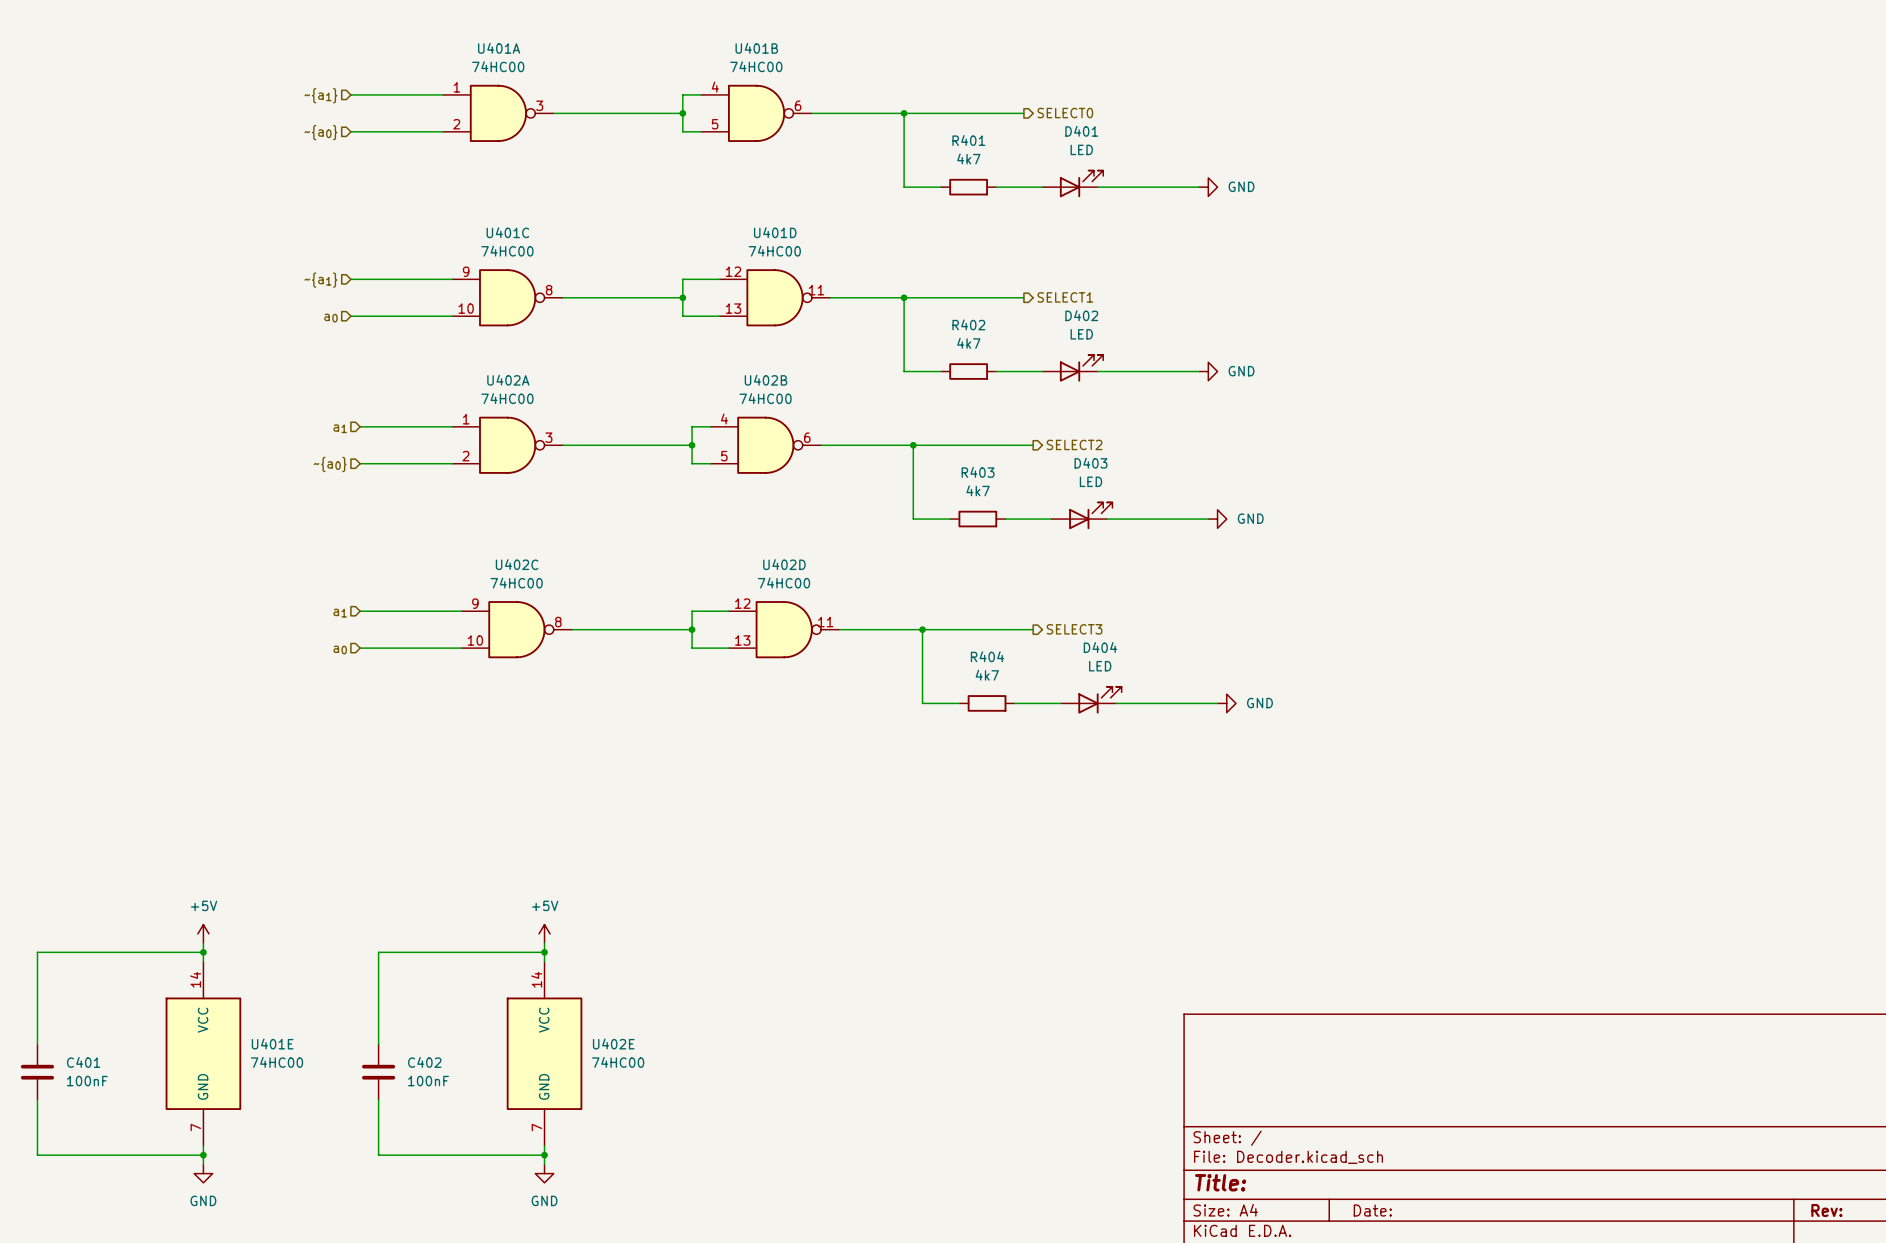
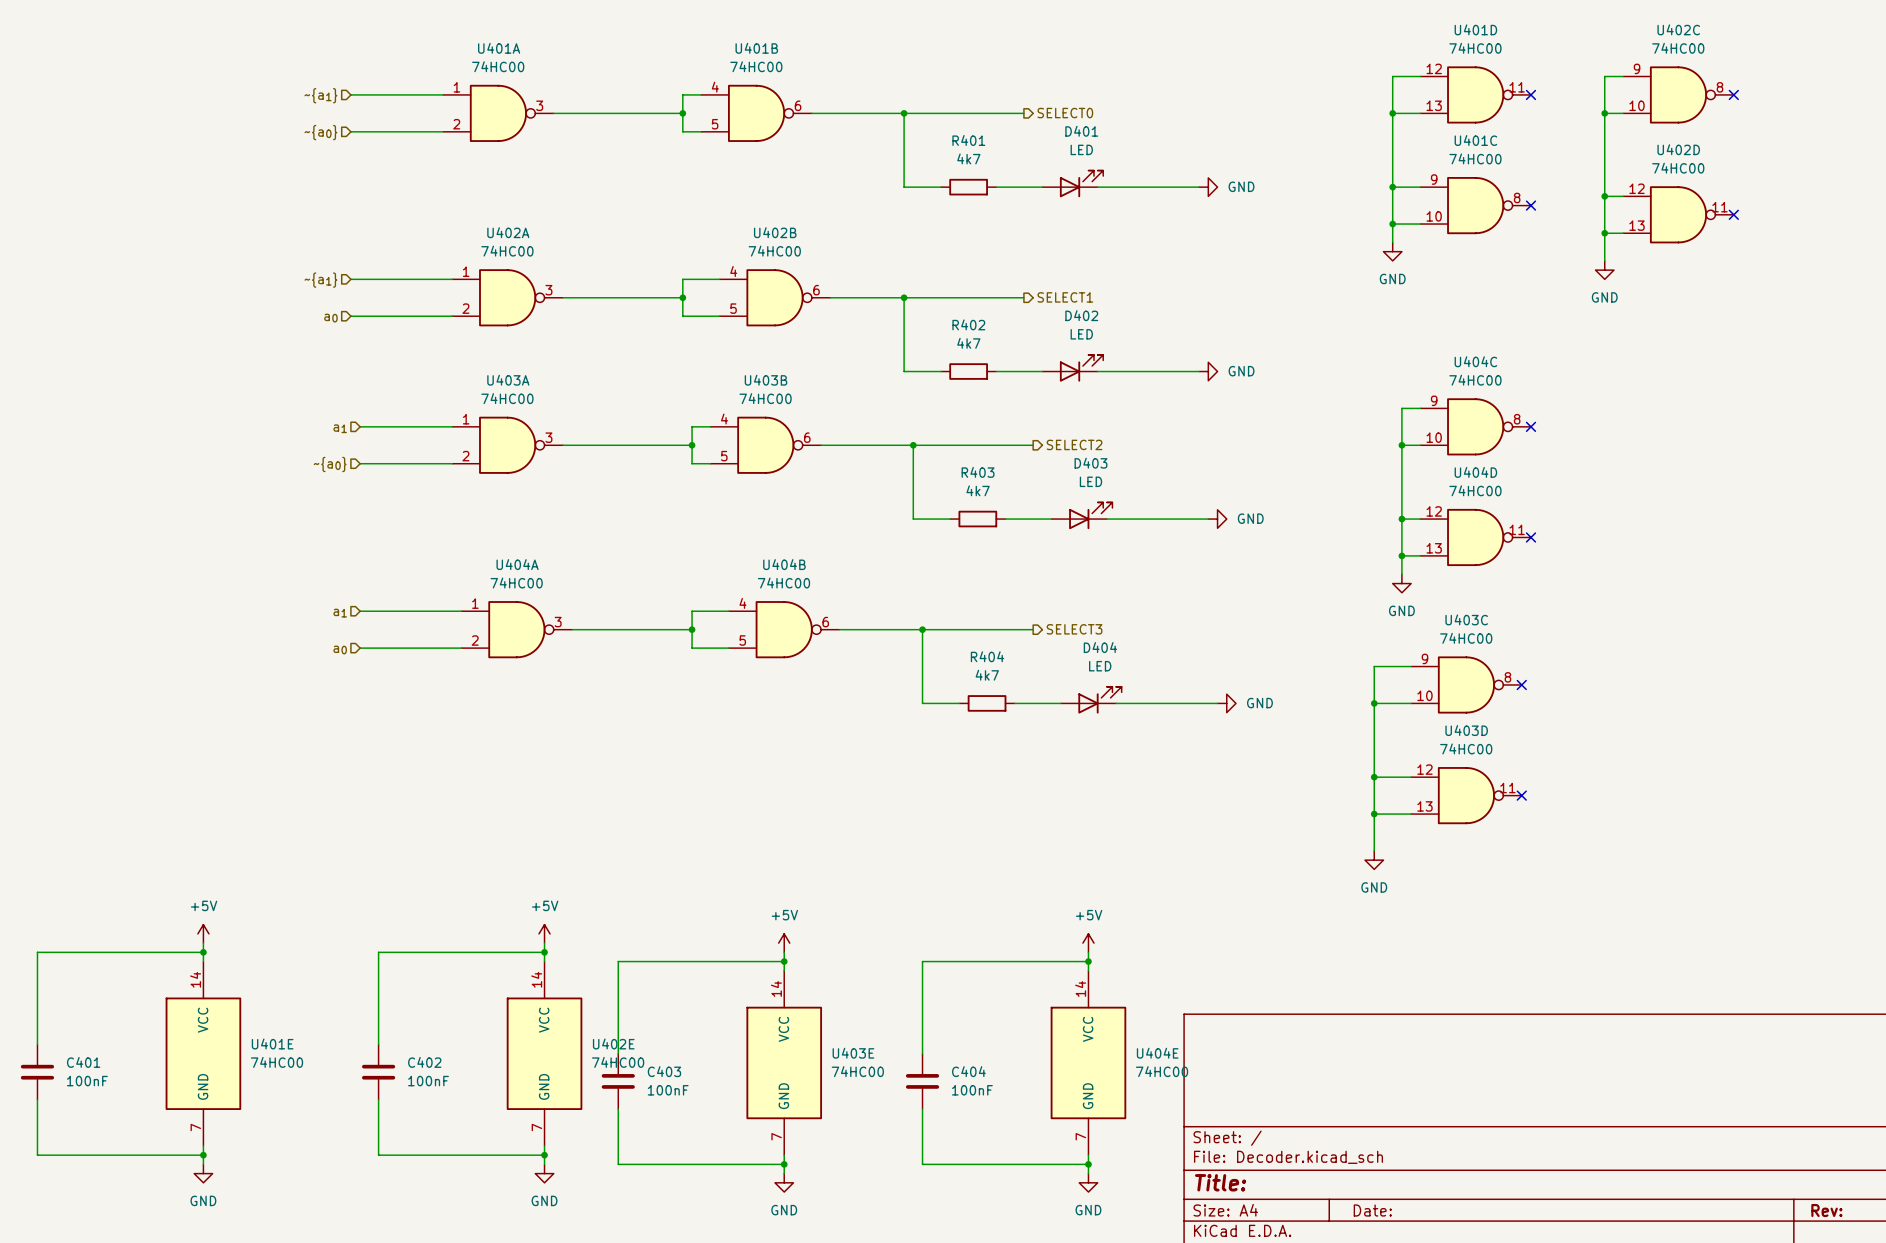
wire: none -> (1420, 76) (1392, 76) (1392, 242)
wire: none -> (1623, 76) (1604, 76) (1604, 260)
no-connect mark: none -> (1530, 94)
no-connect mark: none -> (1733, 94)
wire: none -> (1392, 113) (1420, 113)
junction: none -> (1392, 113)
wire: none -> (1604, 113) (1623, 113)
junction: none -> (1604, 113)
wire: none -> (1392, 187) (1420, 187)
junction: none -> (1392, 187)
wire: none -> (1604, 196) (1623, 196)
junction: none -> (1604, 196)
no-connect mark: none -> (1530, 205)
no-connect mark: none -> (1733, 214)
wire: none -> (1392, 224) (1420, 224)
junction: none -> (1392, 224)
wire: none -> (1604, 233) (1623, 233)
junction: none -> (1604, 233)
power symbol: none -> GND (1392, 251)
power symbol: none -> GND (1604, 270)
U401C position: (507, 297) -> (1475, 205)
U402A: none -> 74HC00 (507, 297)
U401D position: (775, 297) -> (1475, 94)
U402B: none -> 74HC00 (775, 297)
U402A name: U402A (508, 380) -> U403A (508, 380)
U402B name: U402B (766, 380) -> U403B (766, 380)
wire: none -> (1420, 408) (1401, 408) (1401, 574)
U404C: none -> 74HC00 (1475, 426)
no-connect mark: none -> (1530, 426)
wire: none -> (1401, 445) (1420, 445)
junction: none -> (1401, 445)
wire: none -> (1401, 519) (1420, 519)
junction: none -> (1401, 519)
U404D: none -> 74HC00 (1475, 537)
no-connect mark: none -> (1530, 537)
wire: none -> (1401, 555) (1420, 555)
junction: none -> (1401, 555)
power symbol: none -> GND (1401, 583)
U402C position: (516, 629) -> (1678, 94)
U404A: none -> 74HC00 (516, 629)
U402D position: (784, 629) -> (1678, 214)
U404B: none -> 74HC00 (784, 629)
wire: none -> (1411, 666) (1374, 666) (1374, 850)
U403C: none -> 74HC00 (1466, 684)
no-connect mark: none -> (1521, 684)
wire: none -> (1374, 703) (1411, 703)
junction: none -> (1374, 703)
wire: none -> (1374, 777) (1411, 777)
junction: none -> (1374, 777)
U403D: none -> 74HC00 (1466, 795)
no-connect mark: none -> (1521, 795)
wire: none -> (1374, 814) (1411, 814)
junction: none -> (1374, 814)
power symbol: none -> GND (1374, 860)
power symbol: none -> +5V (784, 943)
power symbol: none -> +5V (1088, 943)
wire: none -> (784, 952) (784, 970)
wire: none -> (1088, 952) (1088, 970)
wire: none -> (784, 961) (618, 961) (618, 1053)
junction: none -> (784, 961)
wire: none -> (1088, 961) (922, 961) (922, 1053)
junction: none -> (1088, 961)
U403E: none -> 74HC00 (784, 1062)
U404E: none -> 74HC00 (1088, 1062)
C403: none -> 100nF (618, 1081)
C404: none -> 100nF (922, 1081)
wire: none -> (618, 1109) (618, 1164) (784, 1164)
wire: none -> (922, 1109) (922, 1164) (1088, 1164)
wire: none -> (784, 1155) (784, 1173)
wire: none -> (1088, 1155) (1088, 1173)
junction: none -> (784, 1164)
junction: none -> (1088, 1164)
power symbol: none -> GND (784, 1182)
power symbol: none -> GND (1088, 1182)

